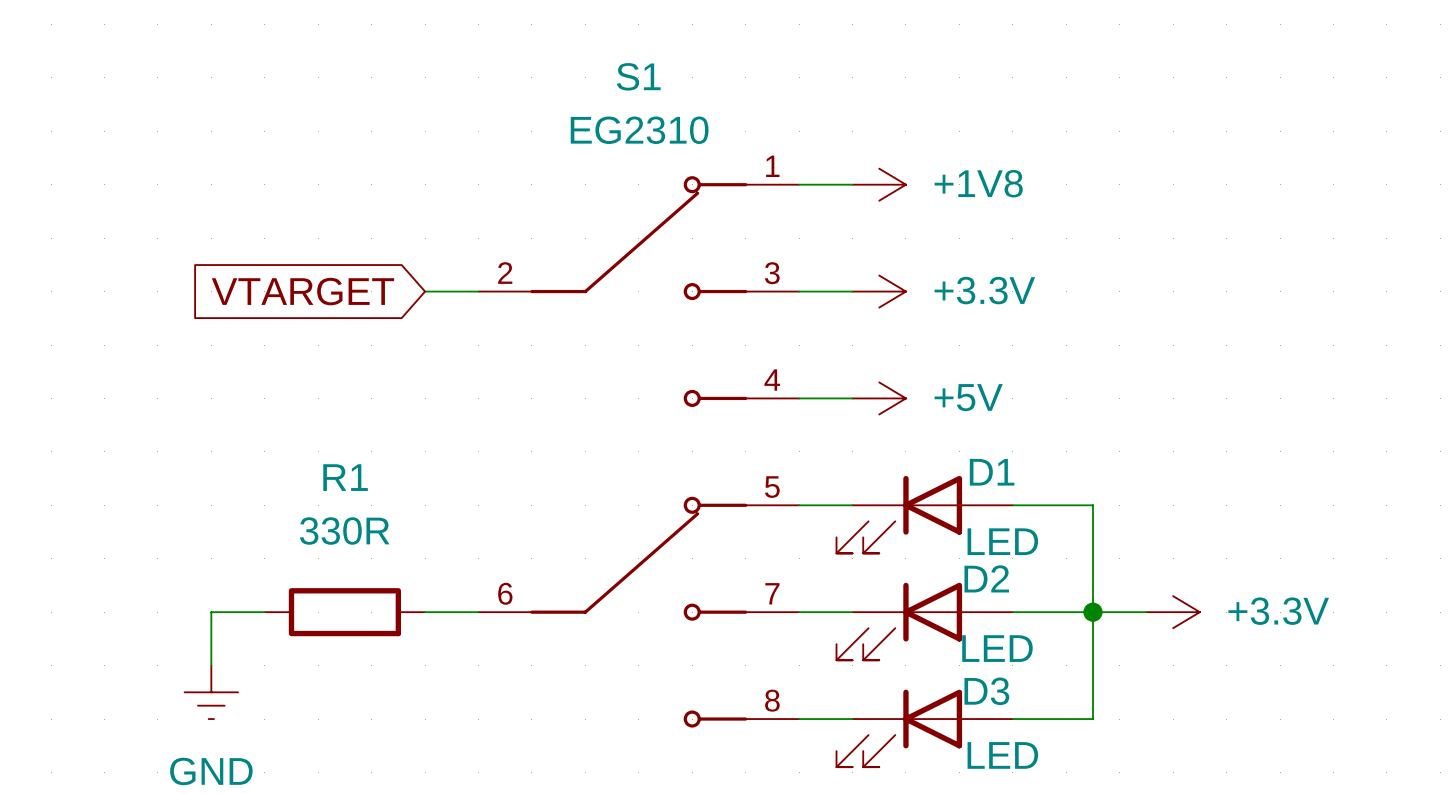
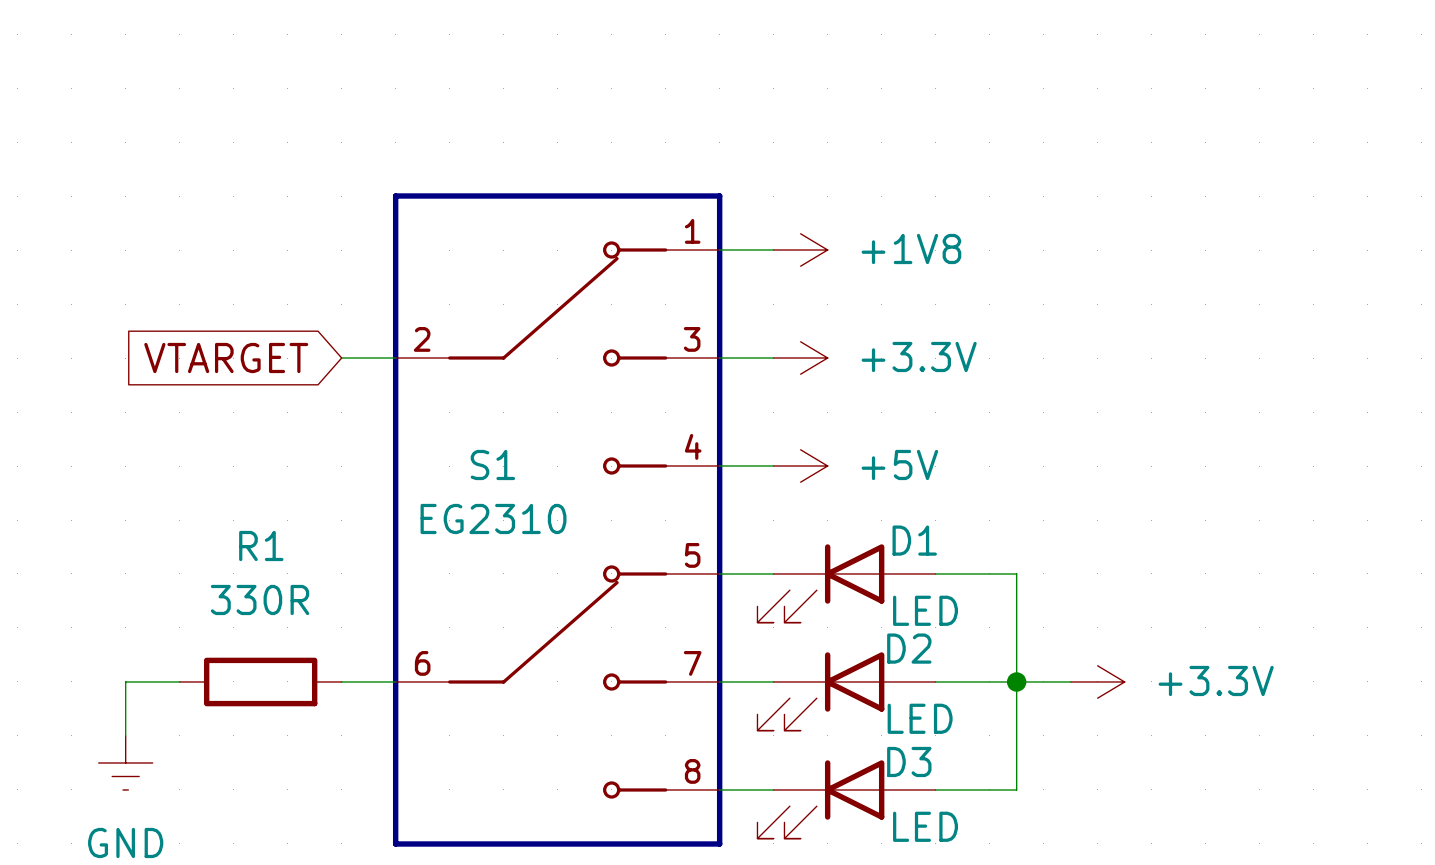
S1 name position: S1 (638, 76) -> S1 (492, 464)
S1 value position: EG2310 (639, 130) -> EG2310 (493, 518)
line: none -> (395, 196) (719, 196) (719, 843) (395, 843) (395, 196)

